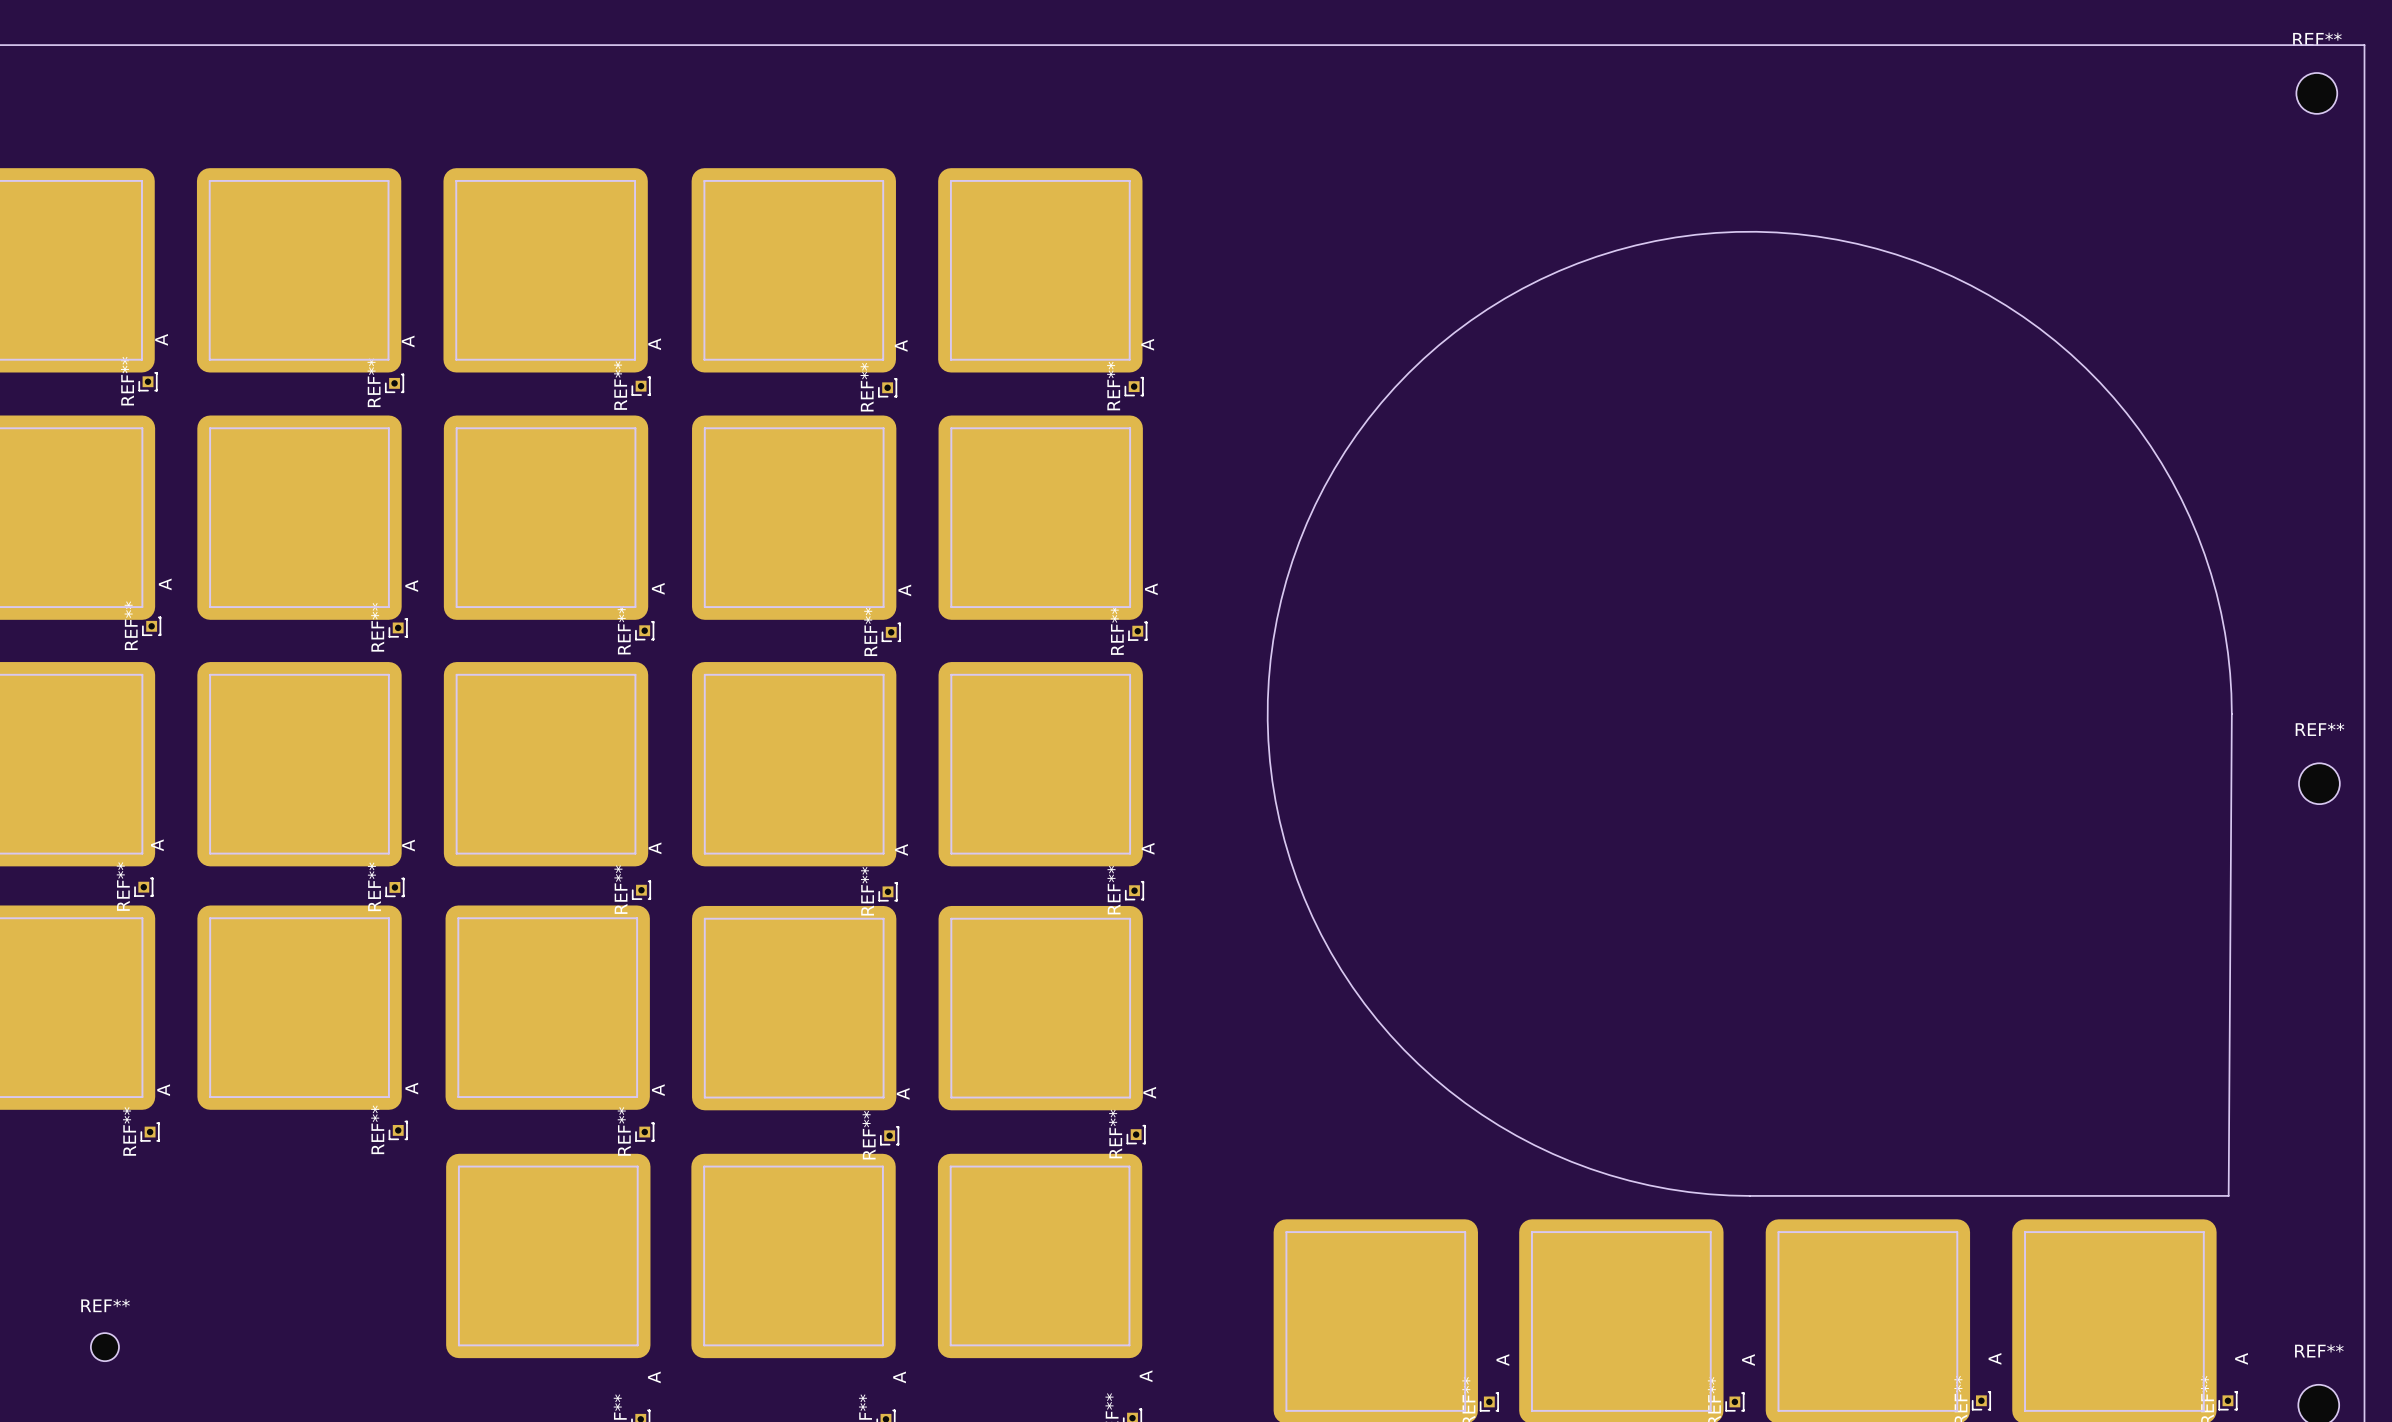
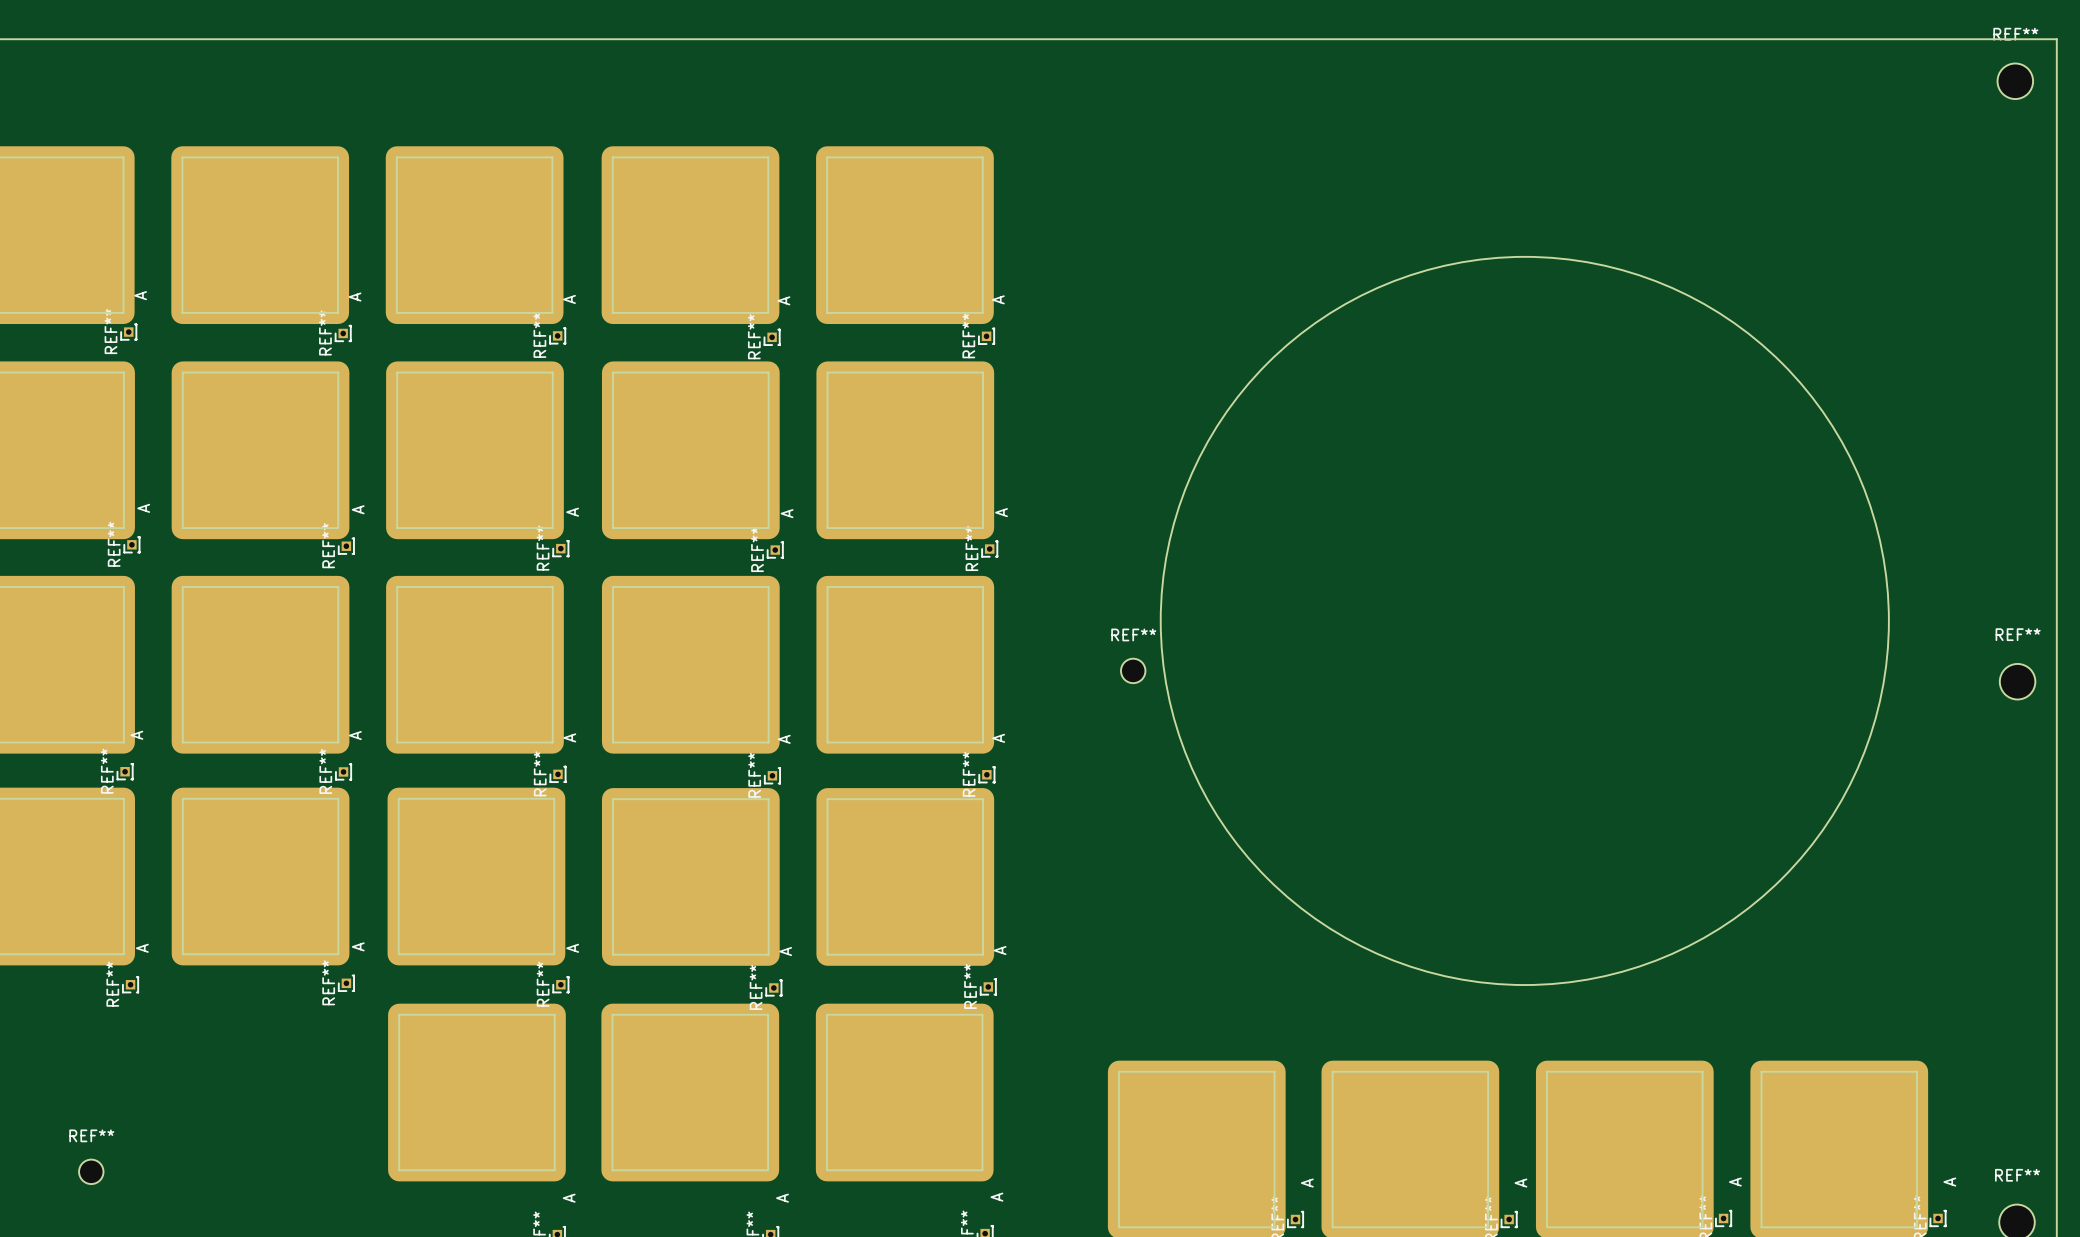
round board edge: none -> [1160, 256, 1890, 986]
board edge: (2231, 713) (2228, 1195) (1749, 1195) (1709, 1194) (1668, 1189) (1629, 1180) (1571, 1161) (1534, 1145) (1481, 1114) (1449, 1090) (1418, 1064) (1377, 1019) (1341, 970) (1312, 916) (1296, 879) (1284, 840) (1272, 781) (1267, 720) (1270, 659) (1276, 619) (1286, 580) (1299, 541) (1324, 486) (1345, 451) (1368, 418) (1408, 372) (1454, 332) (1487, 309) (1522, 288) (1559, 271) (1616, 250) (1655, 240) (1715, 232) (1756, 231) (1796, 234) (1837, 239) (1876, 248) (1934, 268) (1971, 285) (2006, 305) (2039, 328) (2085, 368) (2126, 413) (2150, 445) (2171, 480) (2197, 535) (2216, 593) (2225, 633) (2230, 673) (2231, 713) -> none
REF**: none -> (1133, 670)

